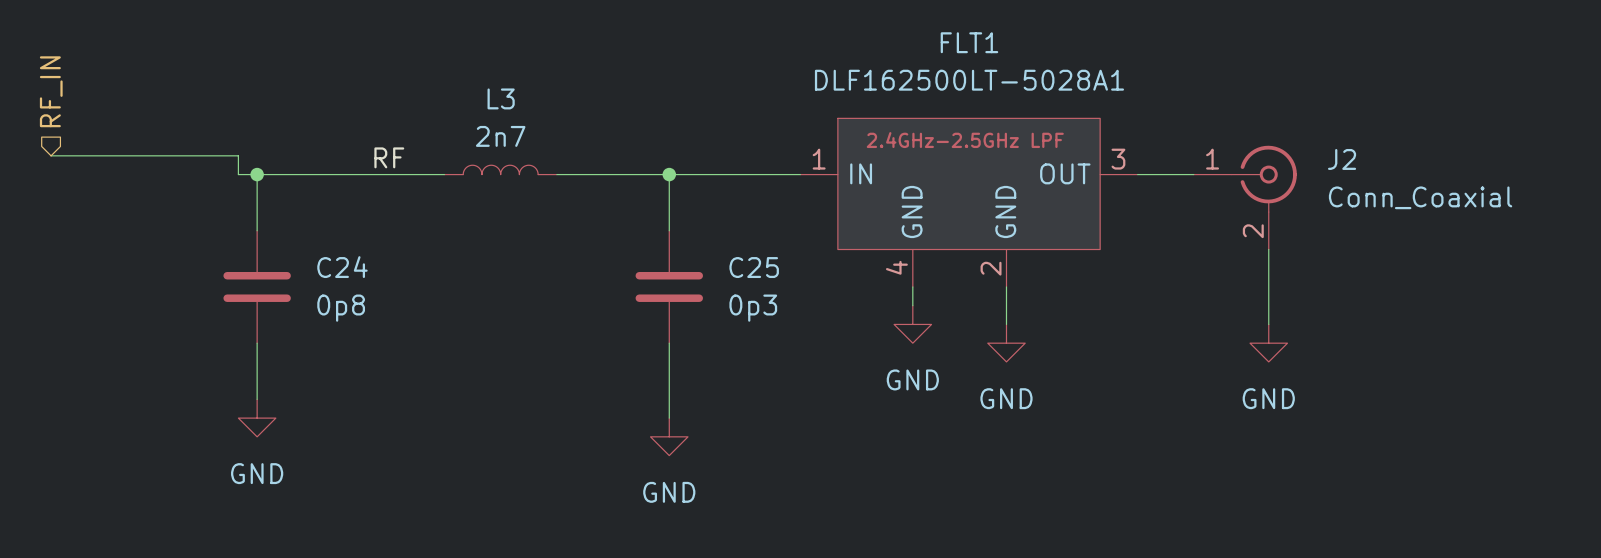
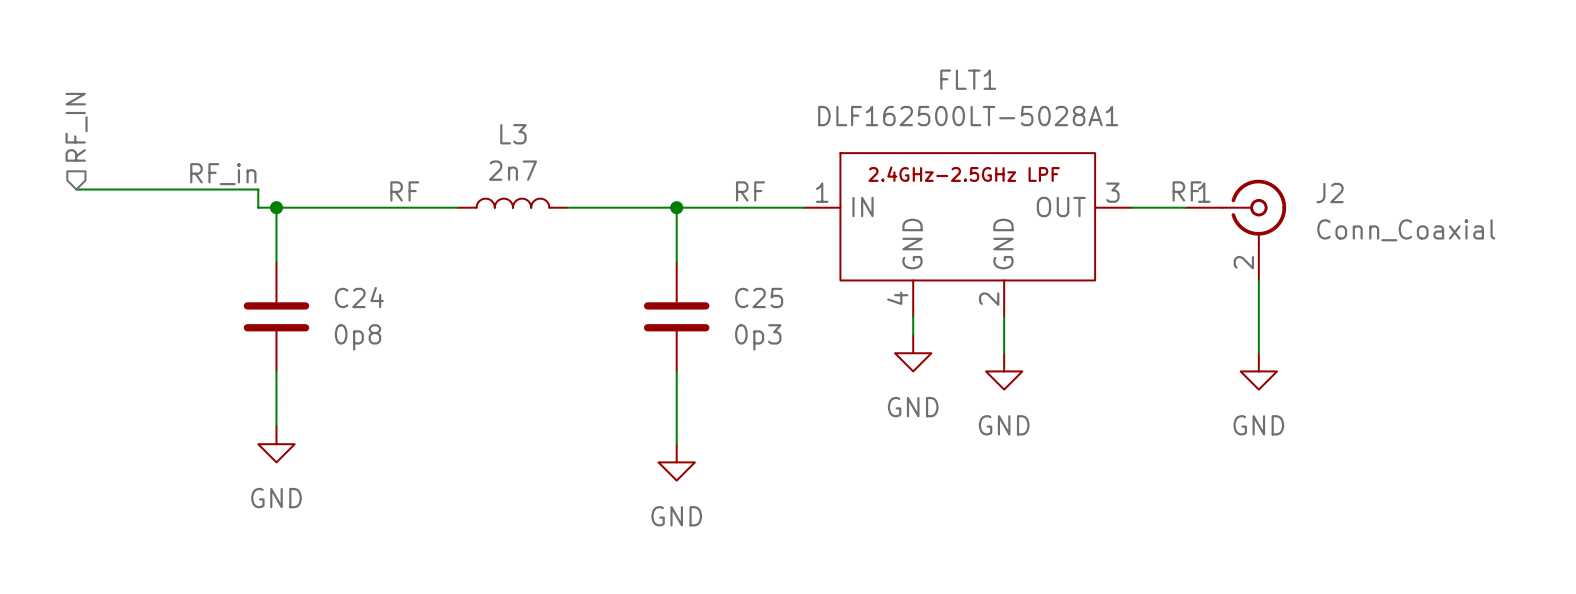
label: none -> RF_in (223, 174)
label: none -> RF (750, 191)
label: none -> RF (1187, 191)

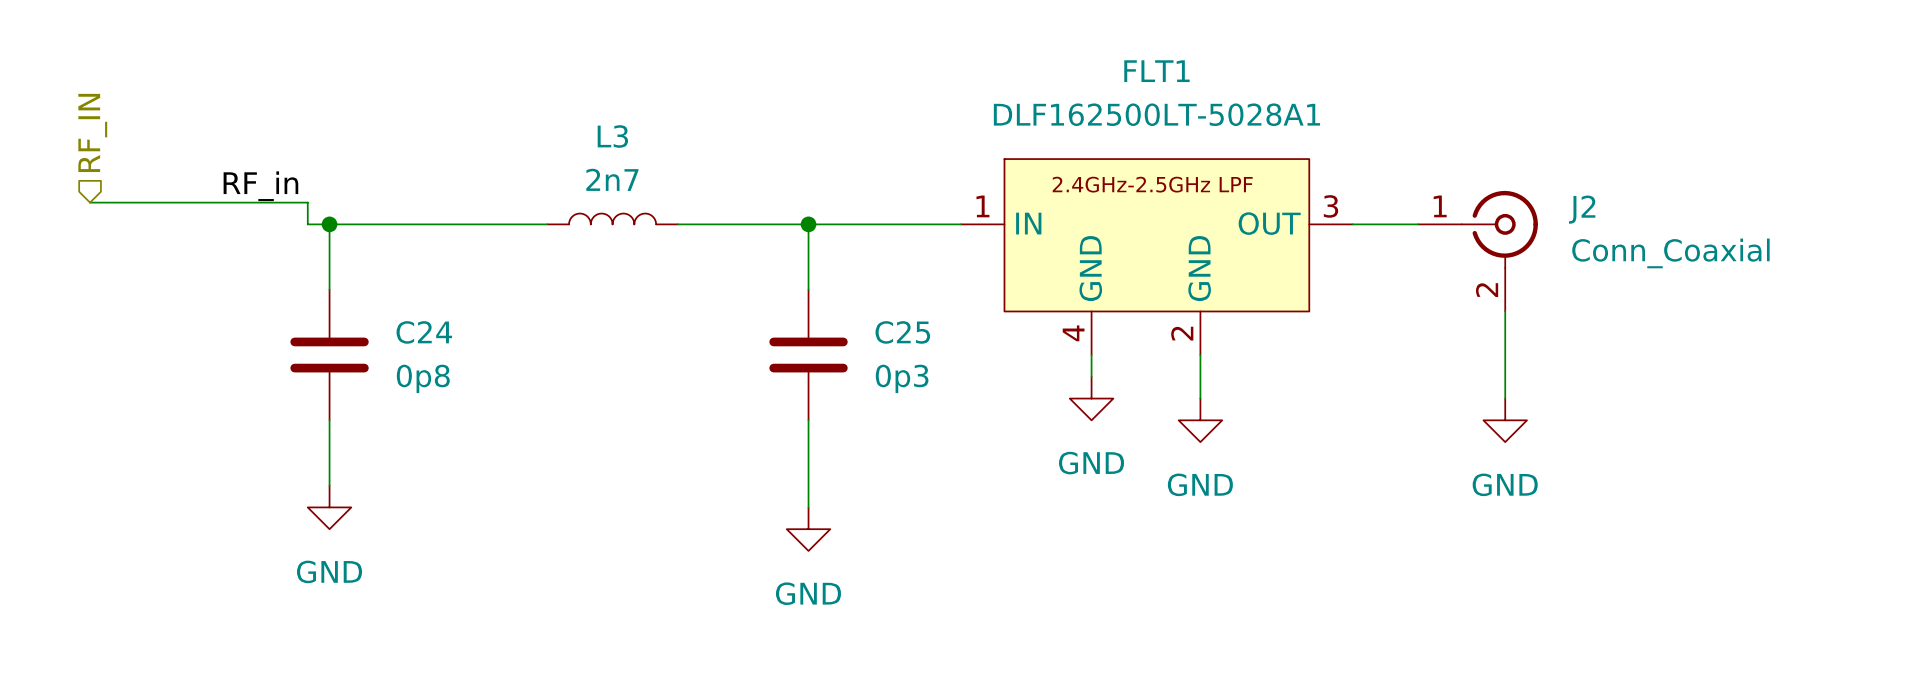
label: RF (404, 191) -> none
label: RF (750, 191) -> none
label: RF (1187, 191) -> none

